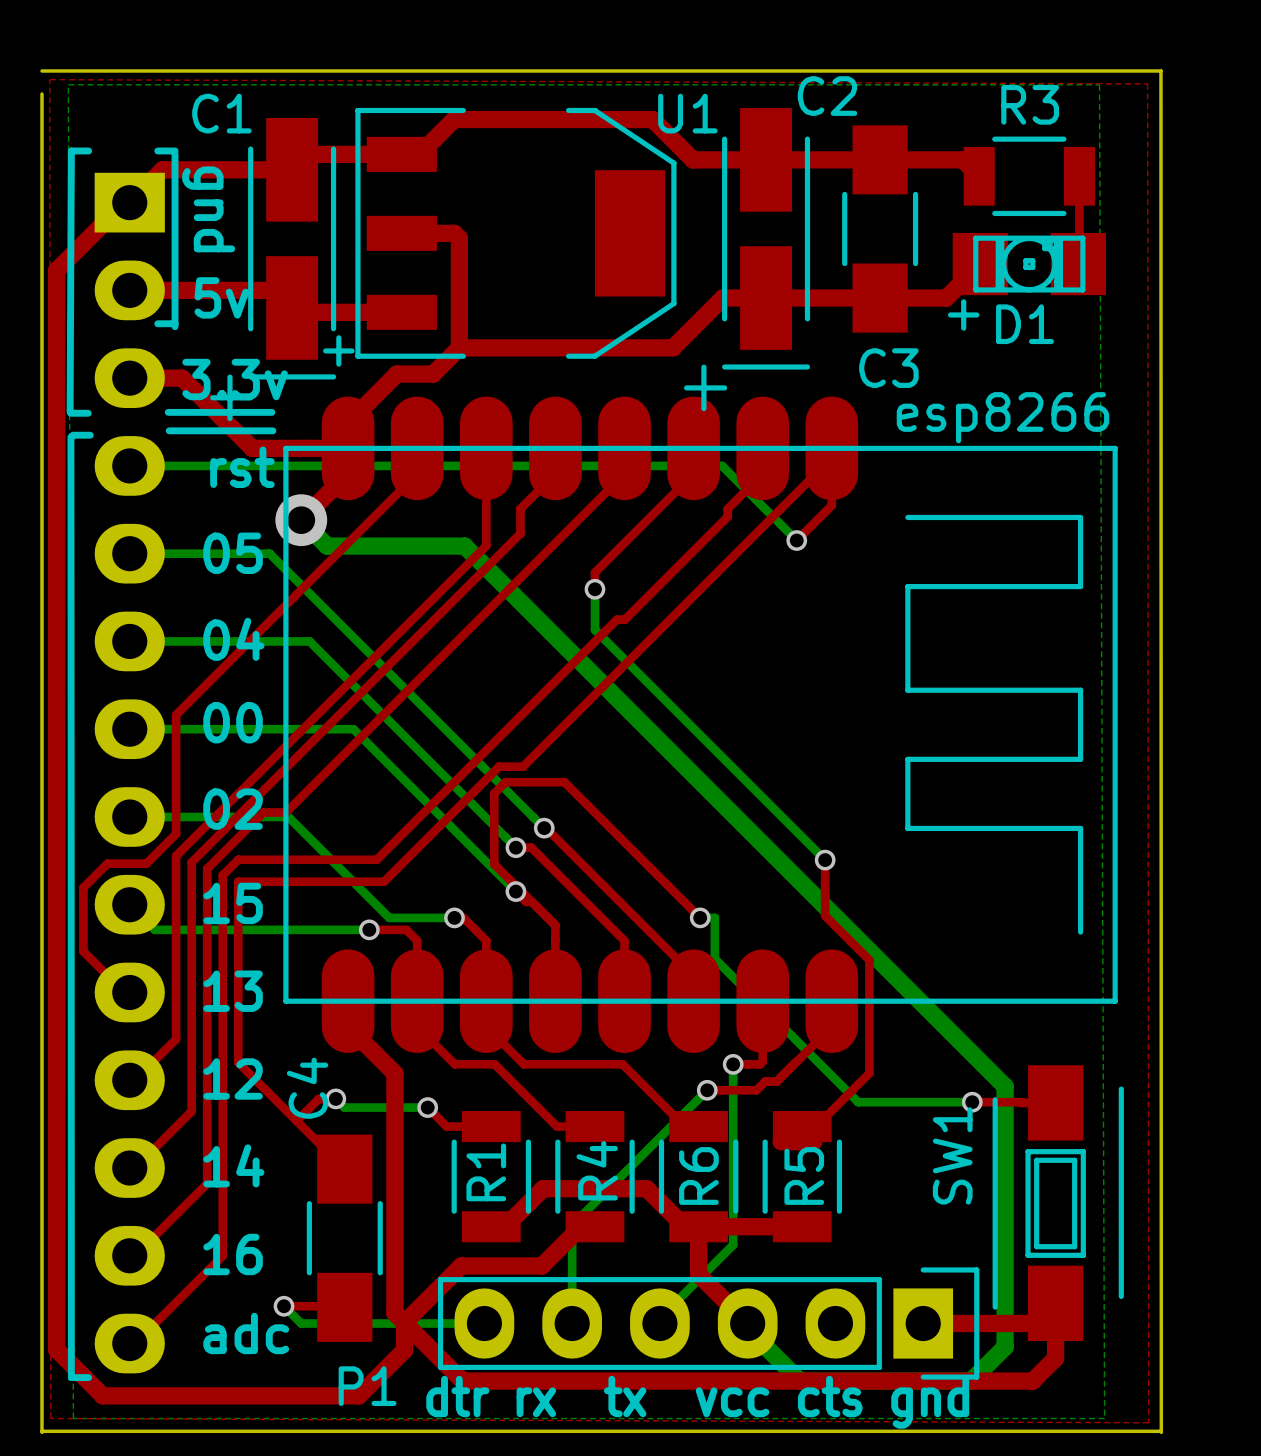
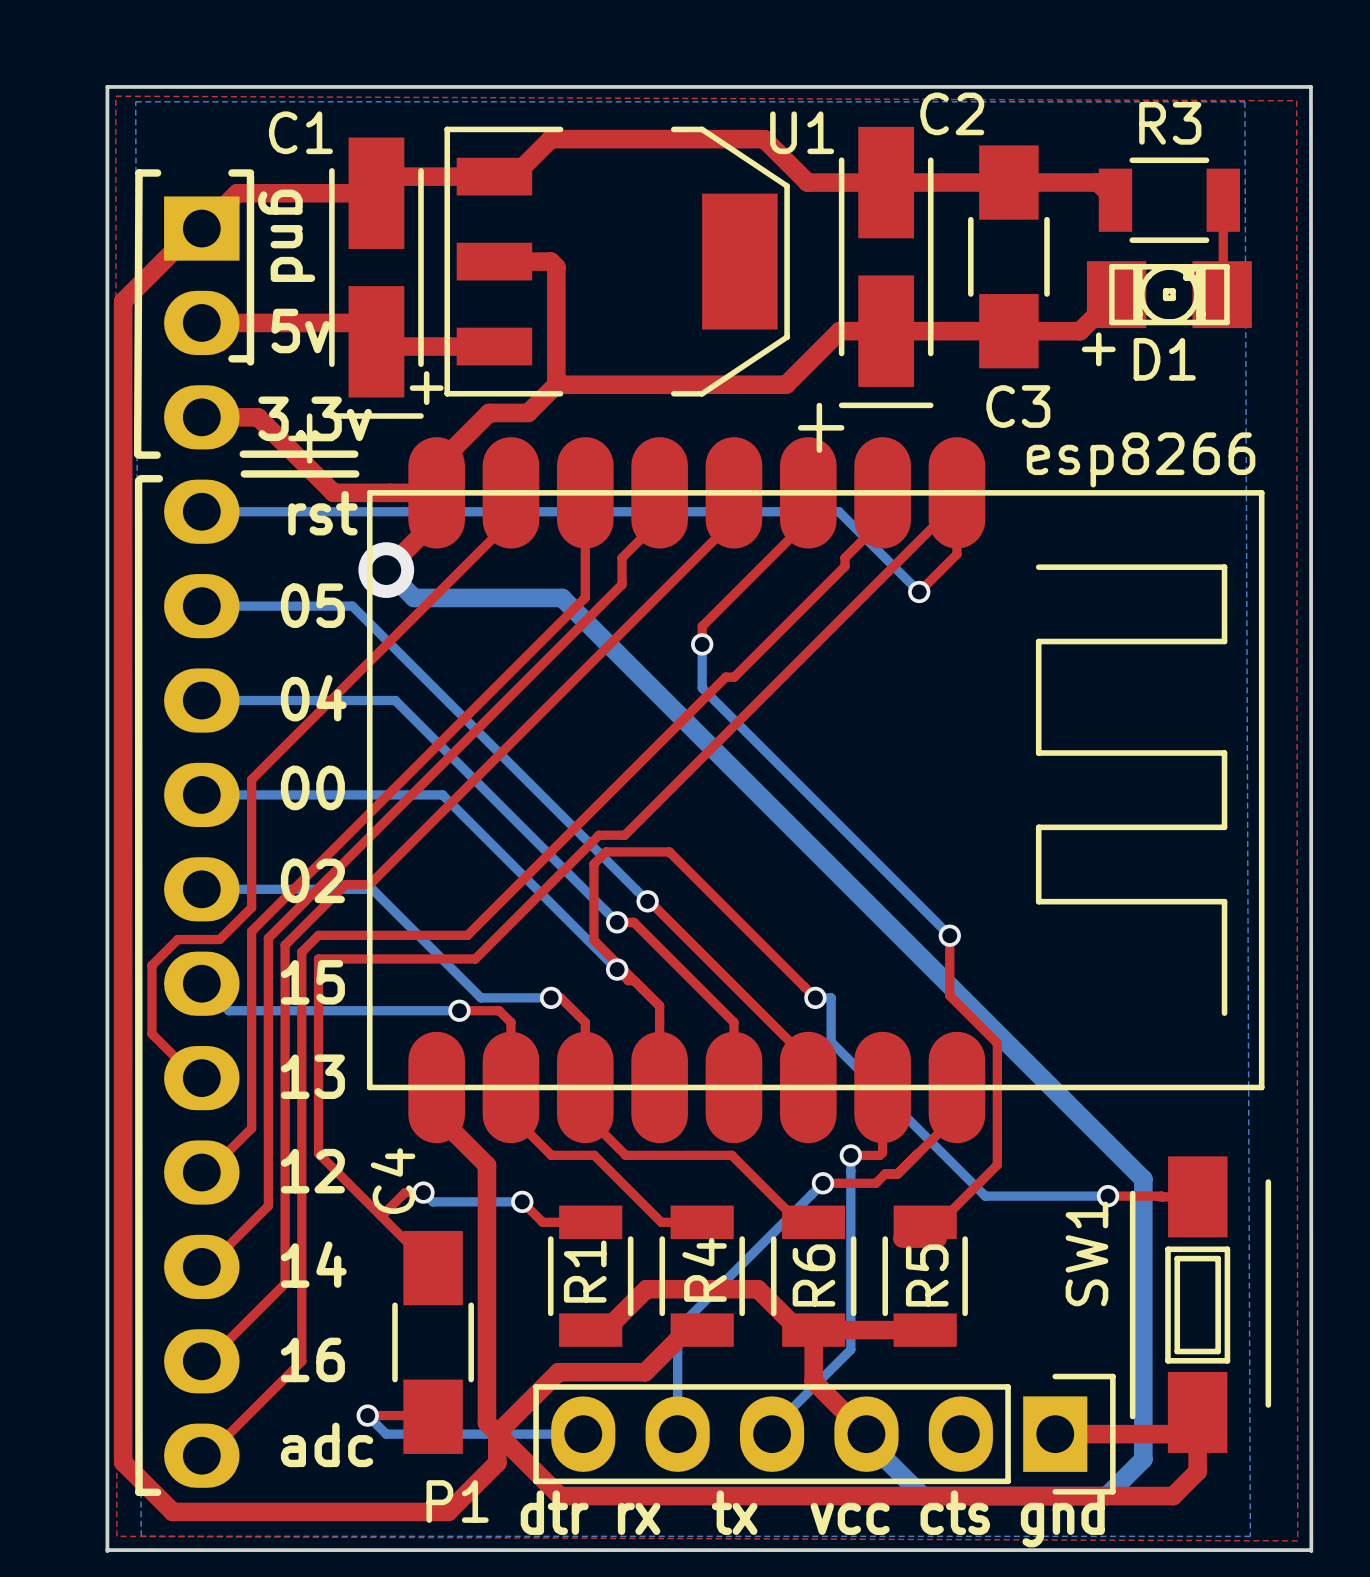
board edge: none -> (107, 86) (107, 111)

